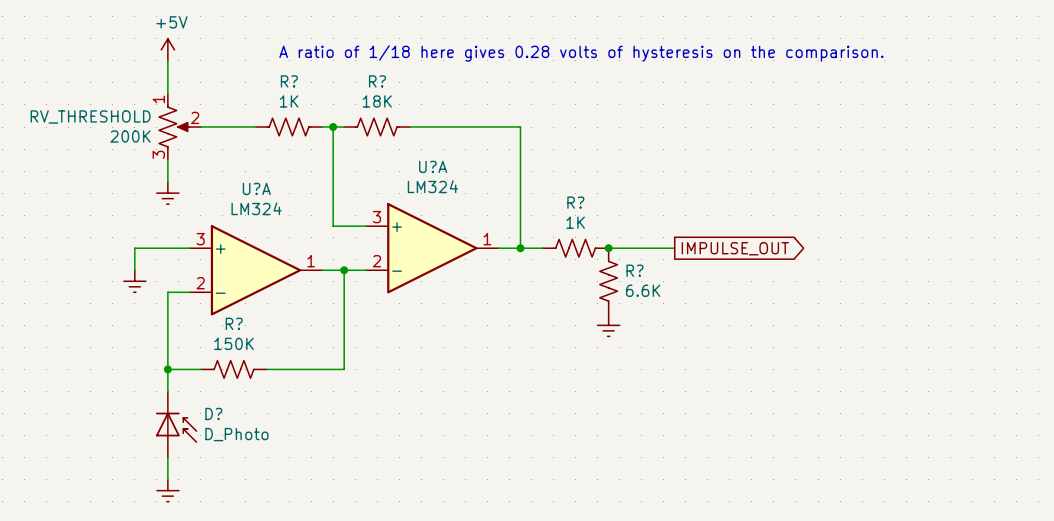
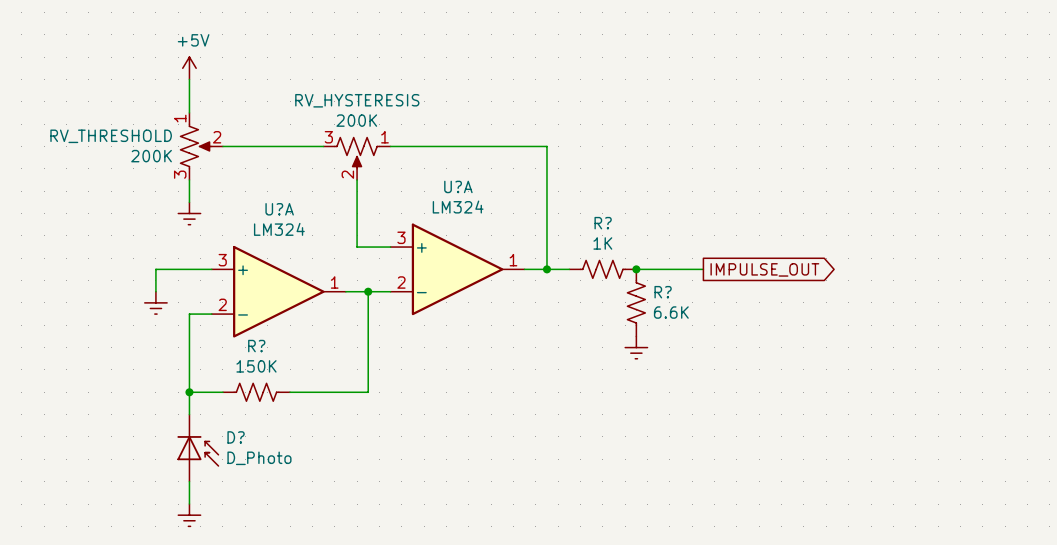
text: A ratio of 1/18 here gives 0.28 volts of hysteresis on the comparison. (581, 53) -> none
wire: none -> (278, 146) (323, 146)
R?: 1K (289, 127) -> none
wire: (322, 127) (344, 127) -> none
junction: (333, 127) -> none
wire: none -> (390, 146) (435, 146)
R?: 18K (377, 127) -> none
RV_HYSTERESIS: none -> 200K (357, 158)

